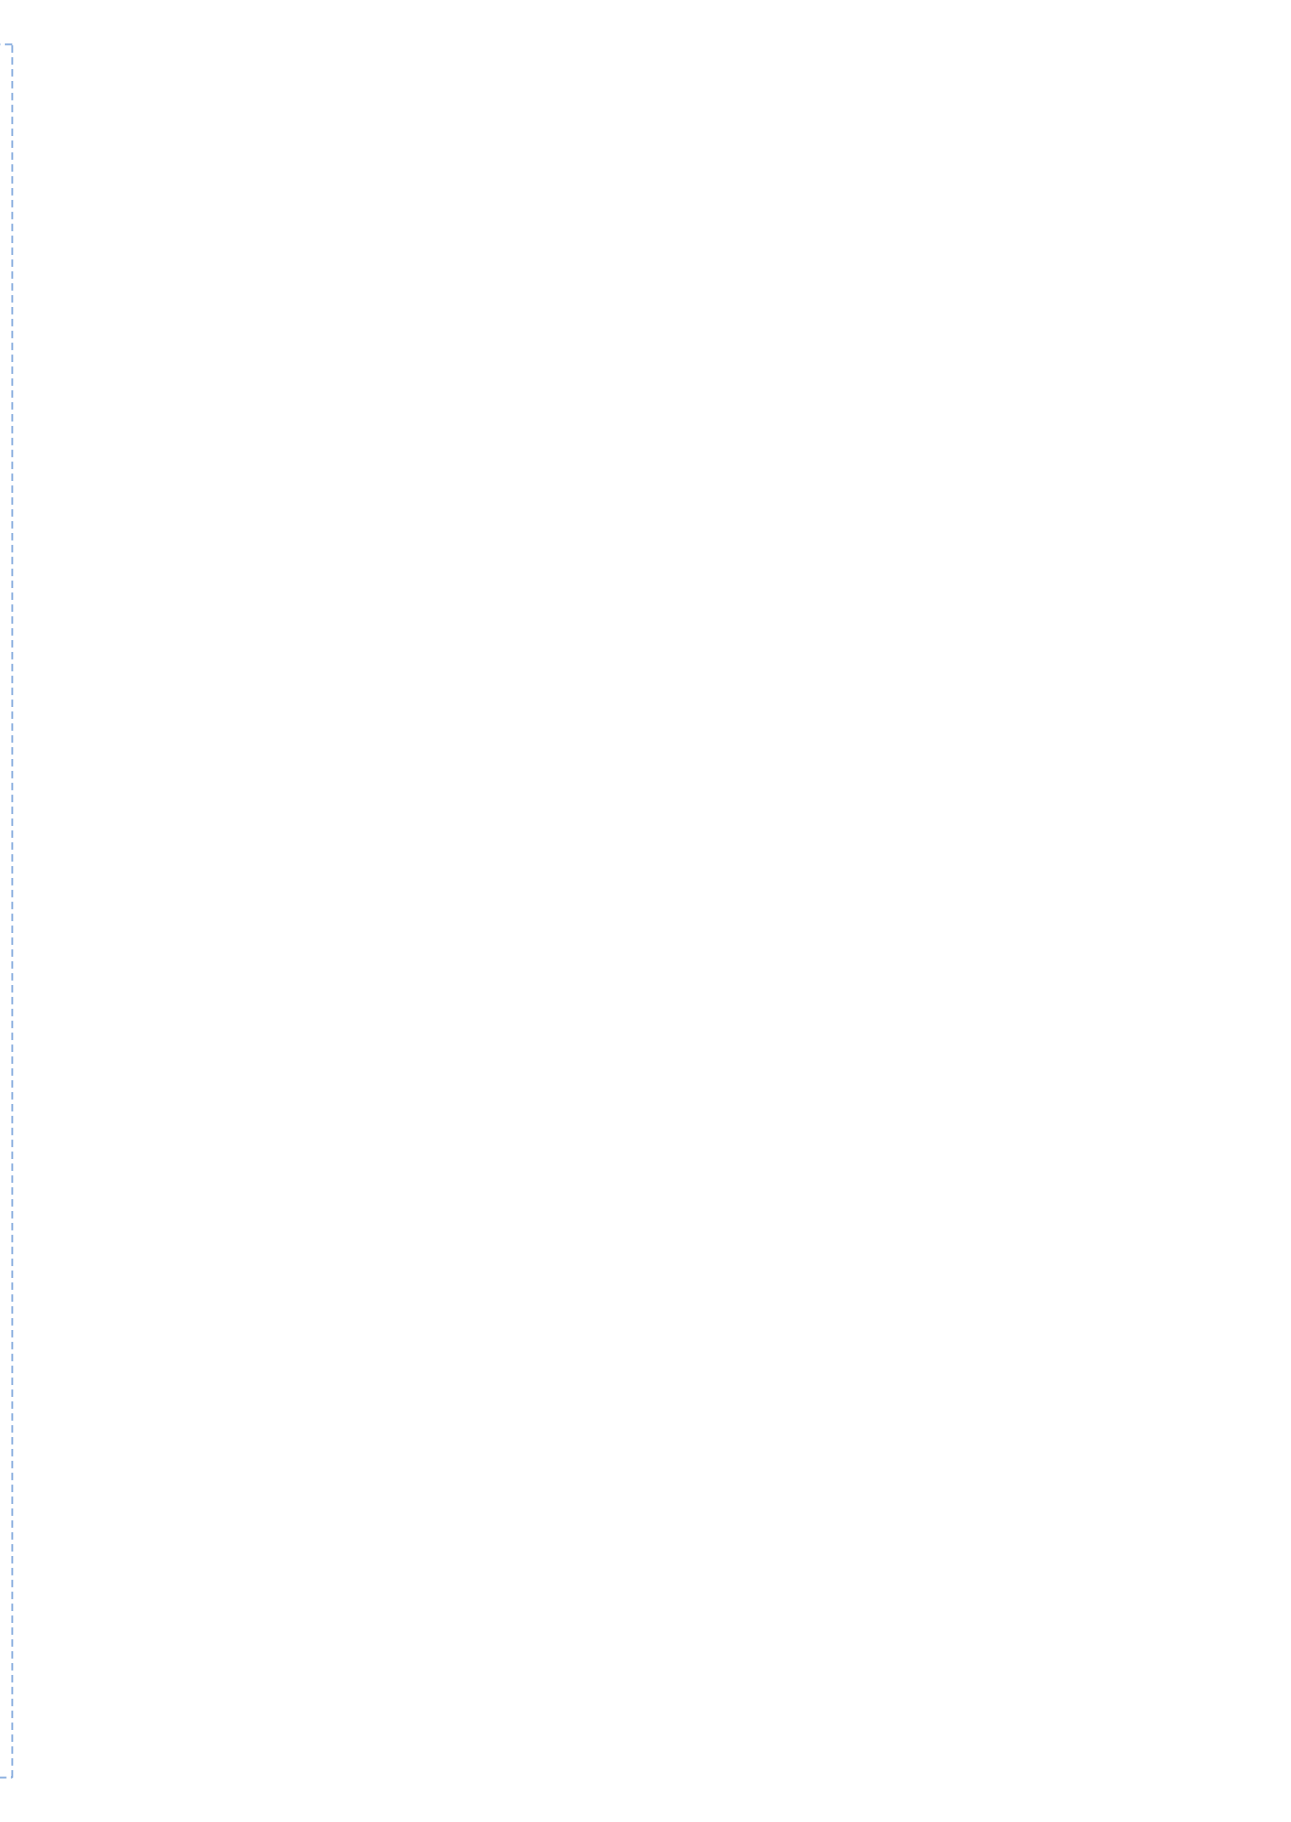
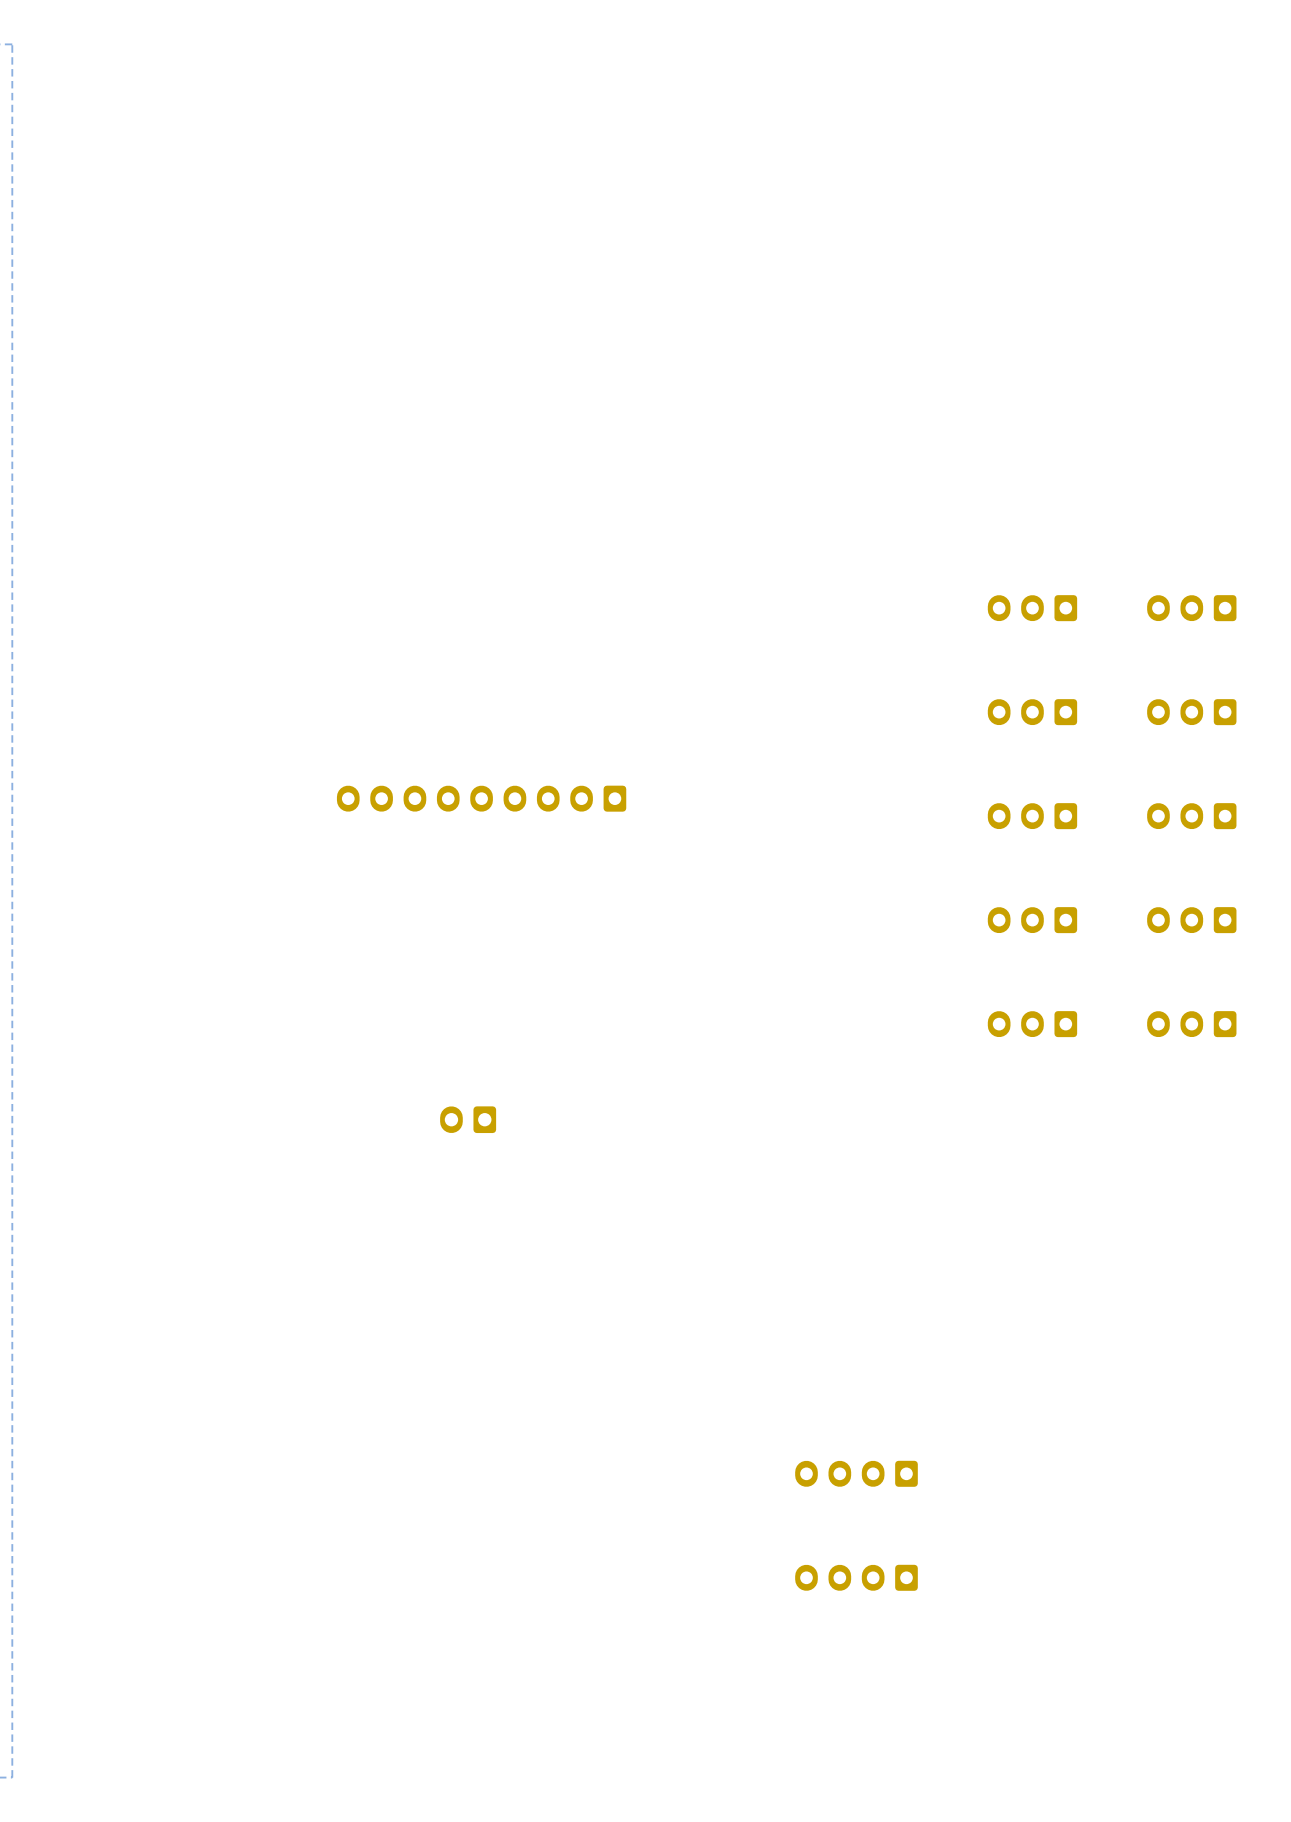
part: none -> (1032, 608)
part: none -> (1191, 608)
part: none -> (1032, 712)
part: none -> (1191, 712)
part: none -> (481, 798)
part: none -> (1032, 816)
part: none -> (1191, 816)
part: none -> (1032, 920)
part: none -> (1191, 920)
part: none -> (1032, 1024)
part: none -> (1191, 1024)
part: none -> (468, 1119)
part: none -> (856, 1473)
part: none -> (856, 1577)

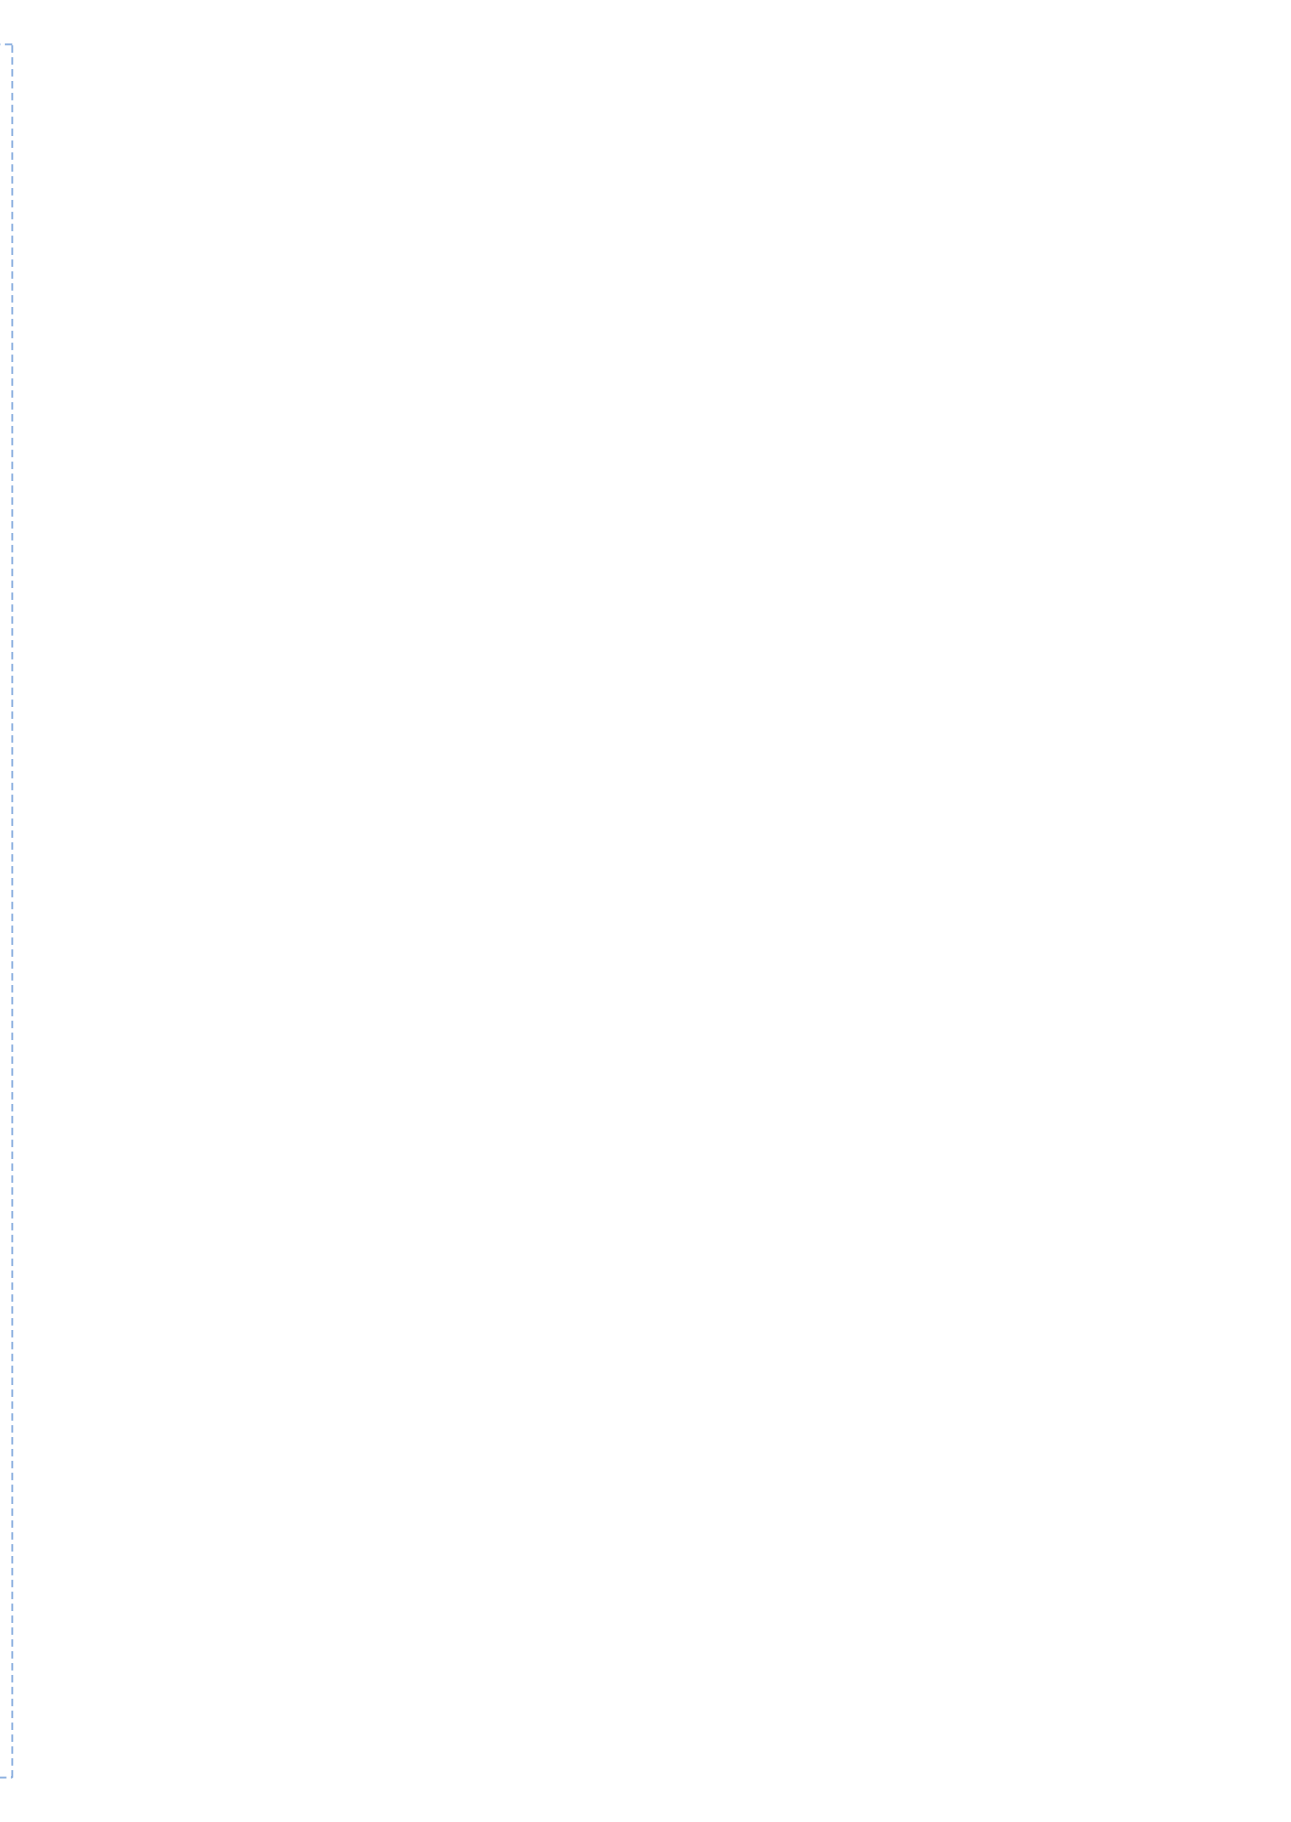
part: (1032, 608) -> none
part: (1191, 608) -> none
part: (1032, 712) -> none
part: (1191, 712) -> none
part: (481, 798) -> none
part: (1032, 816) -> none
part: (1191, 816) -> none
part: (1032, 920) -> none
part: (1191, 920) -> none
part: (1032, 1024) -> none
part: (1191, 1024) -> none
part: (468, 1119) -> none
part: (856, 1473) -> none
part: (856, 1577) -> none

